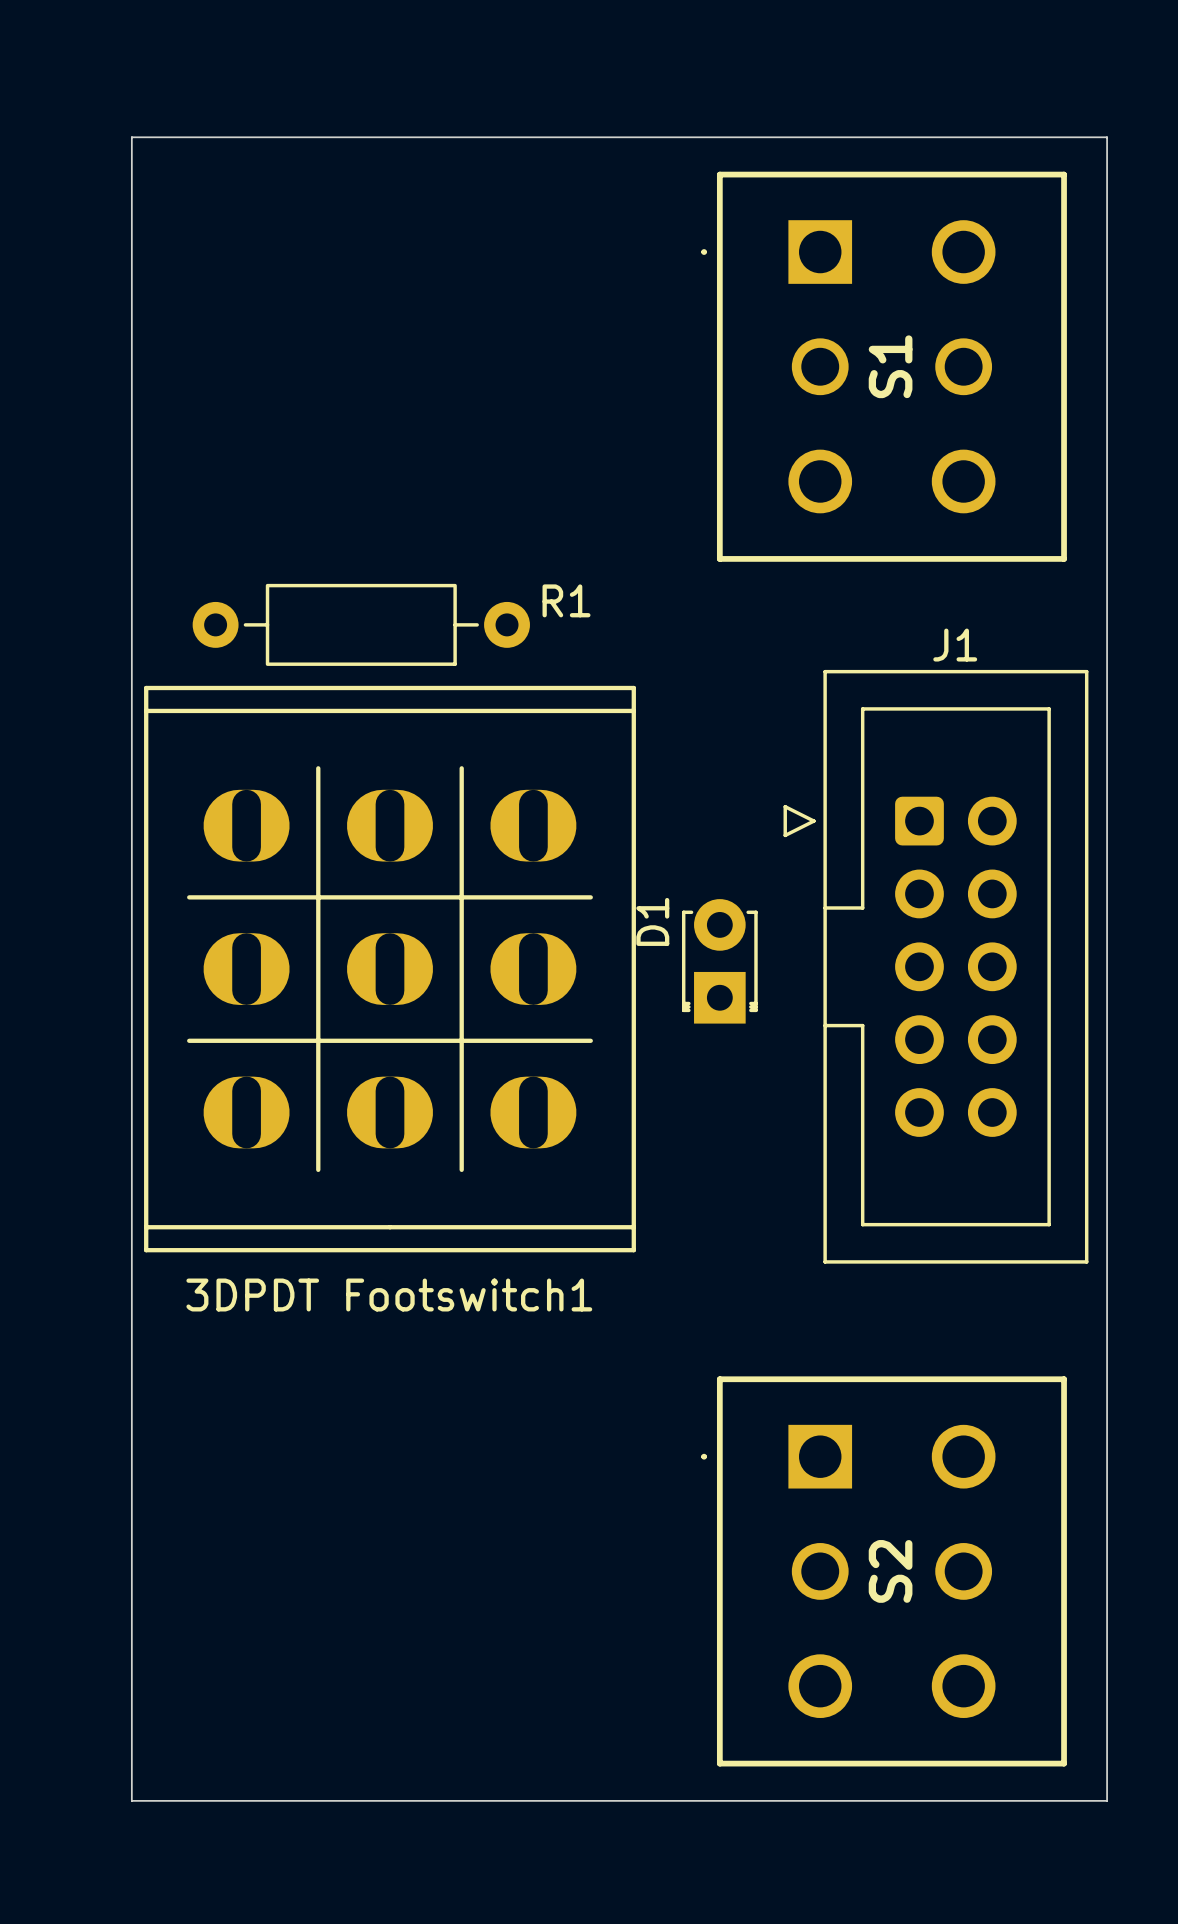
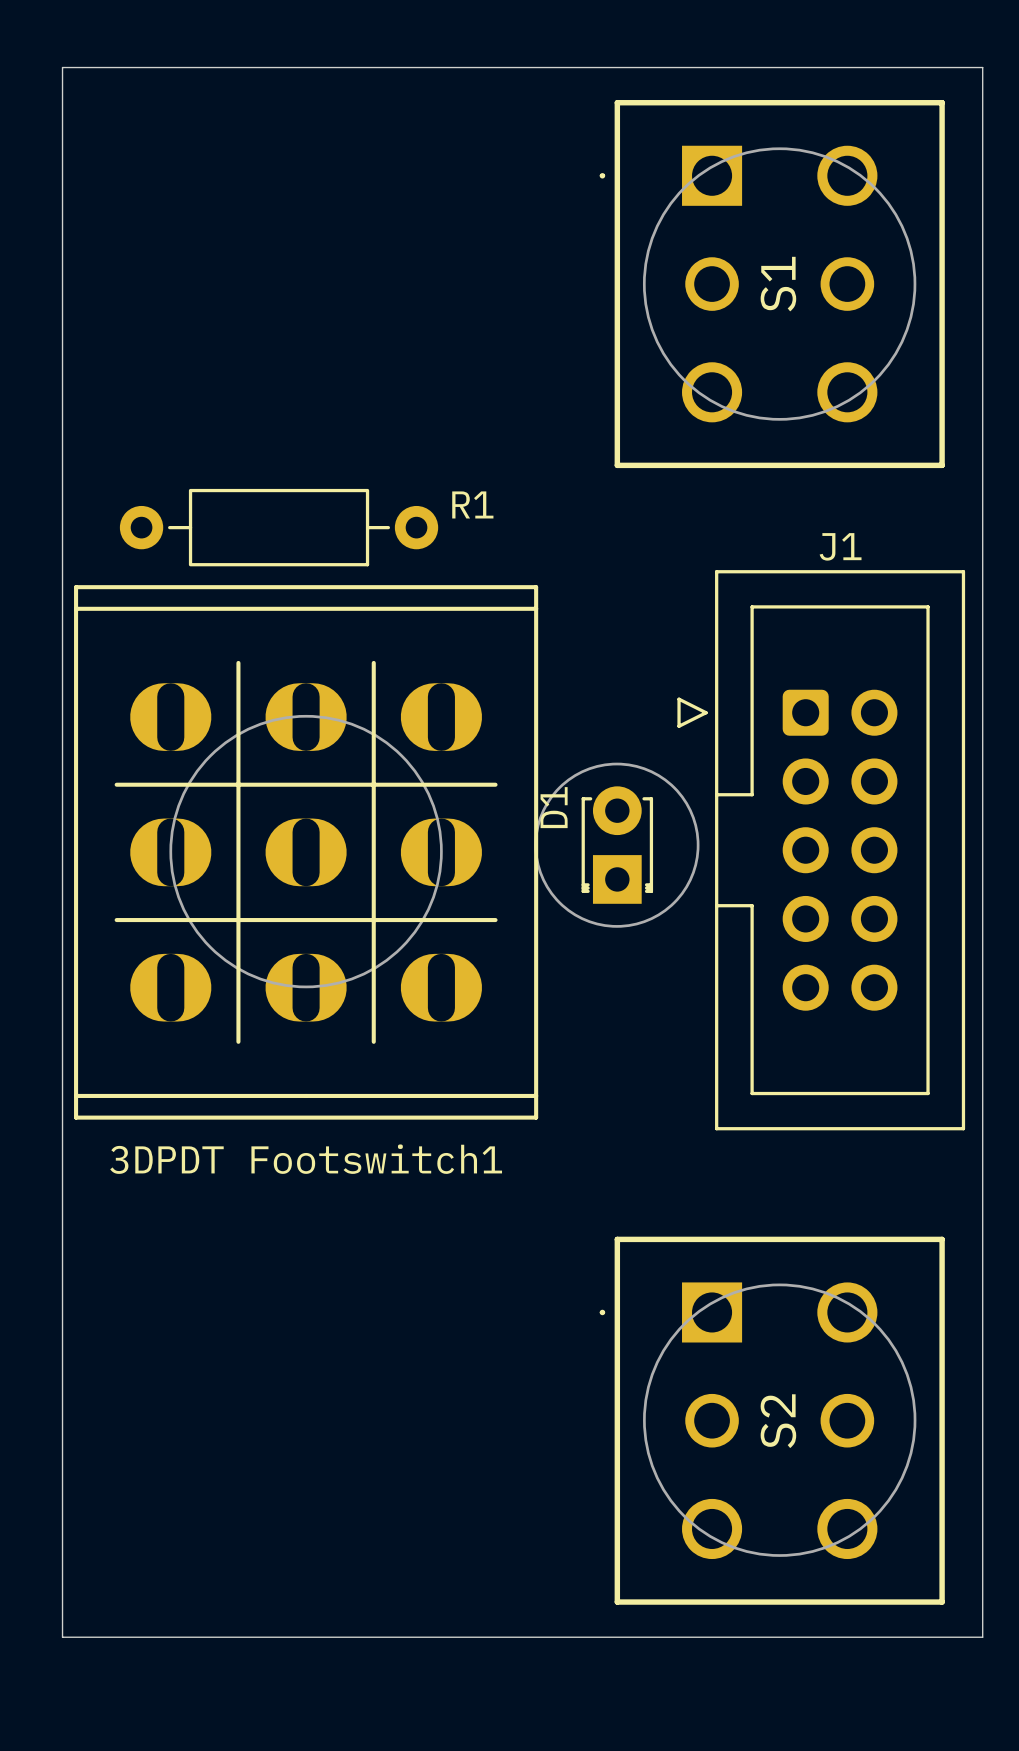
drawing: none -> [642, 147, 917, 421]
drawing: none -> [169, 714, 443, 989]
drawing: none -> [534, 762, 700, 928]
drawing: none -> [643, 1283, 917, 1557]

